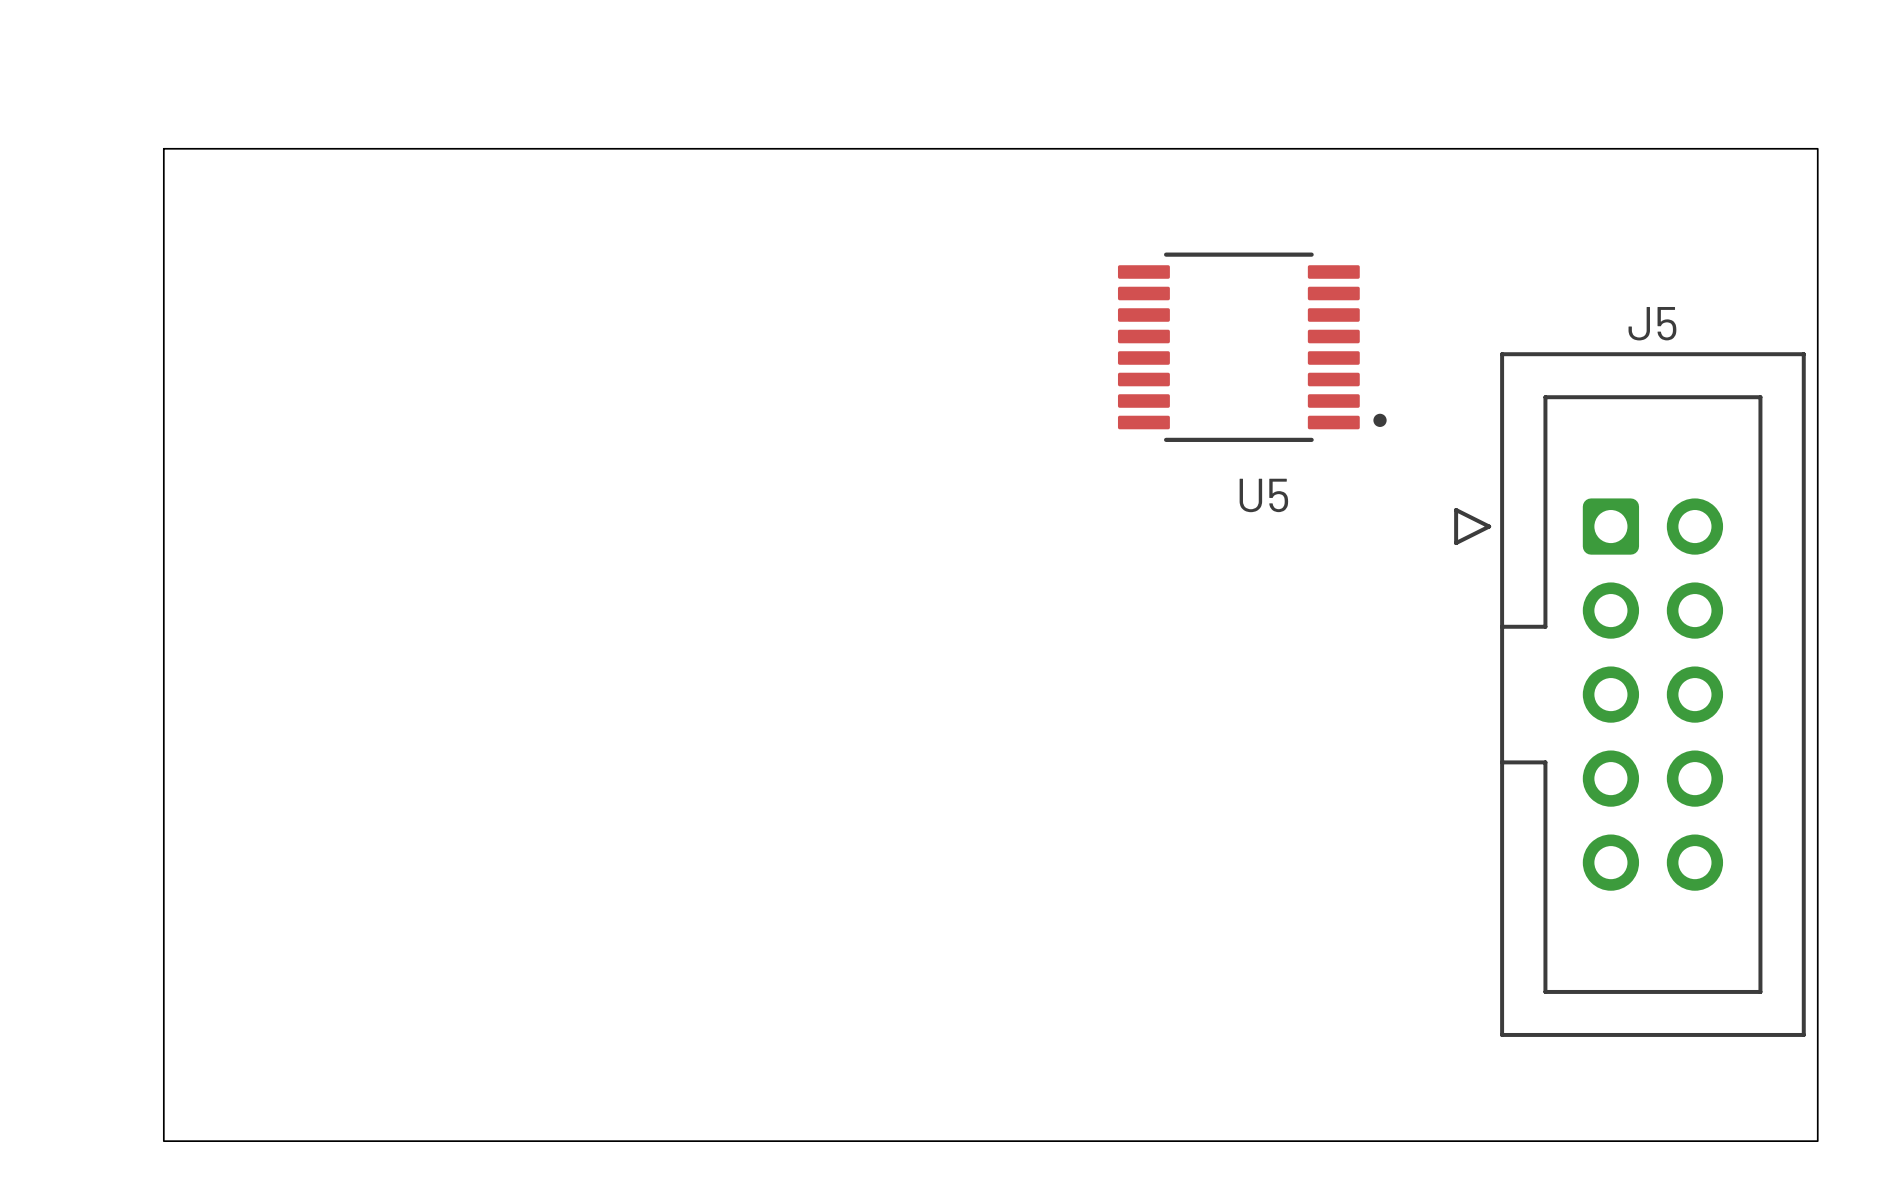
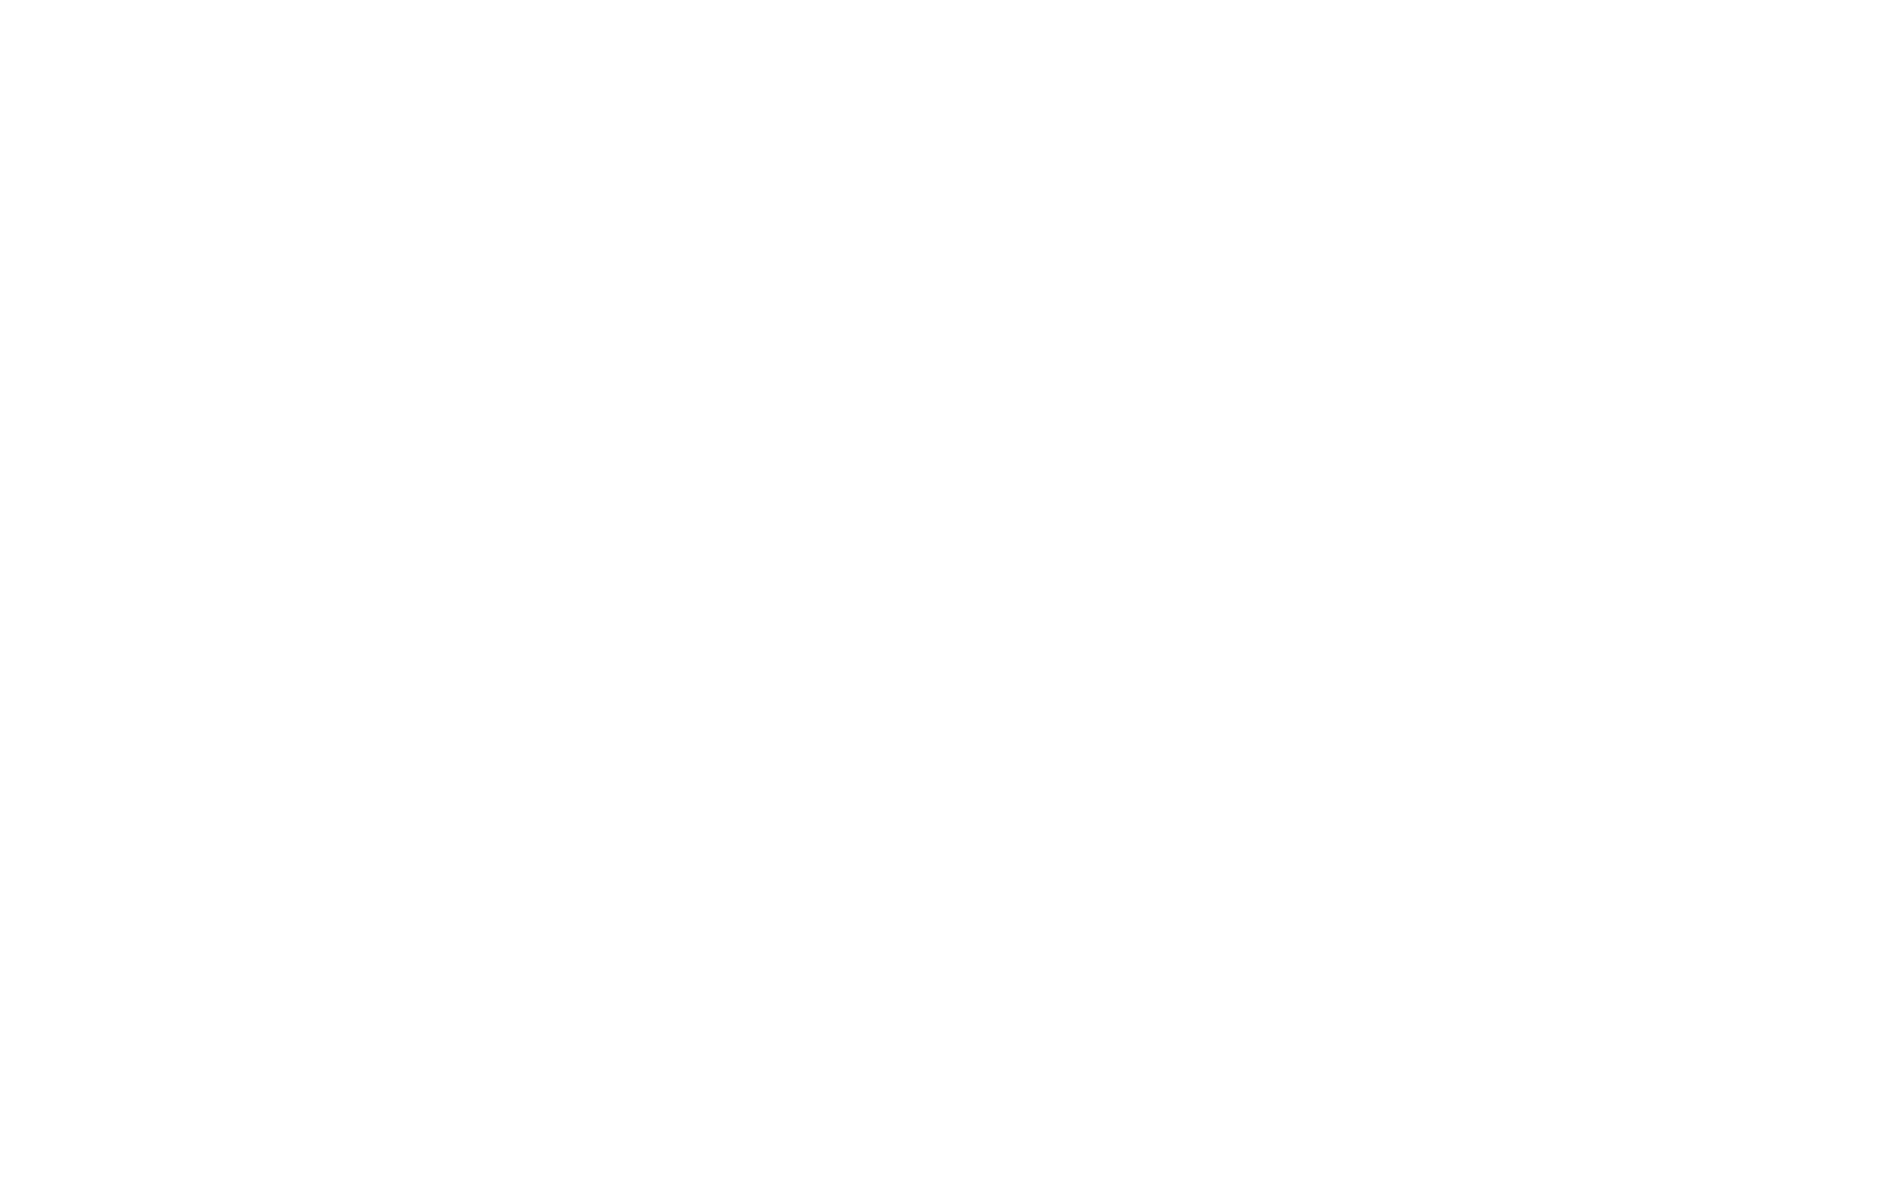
drawing: [162, 147, 1819, 1142] -> none
U5: (1252, 347) -> none
J5: (1629, 694) -> none

